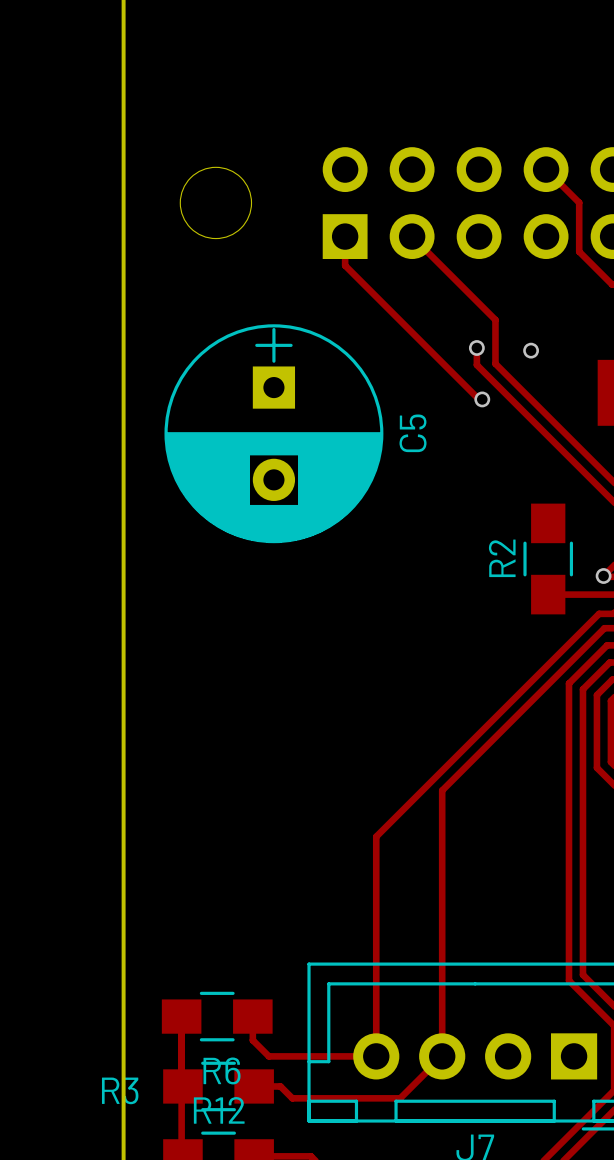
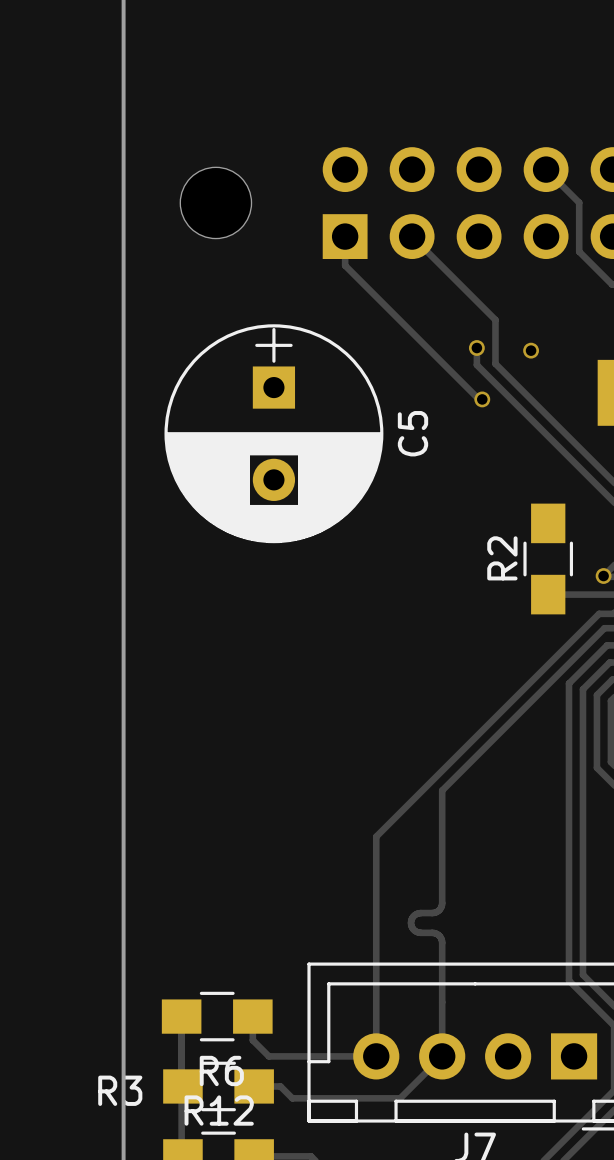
track: (442, 903) (442, 942) -> (442, 903) (436, 912) (414, 915) (410, 922) (416, 931) (438, 935) (442, 942)

